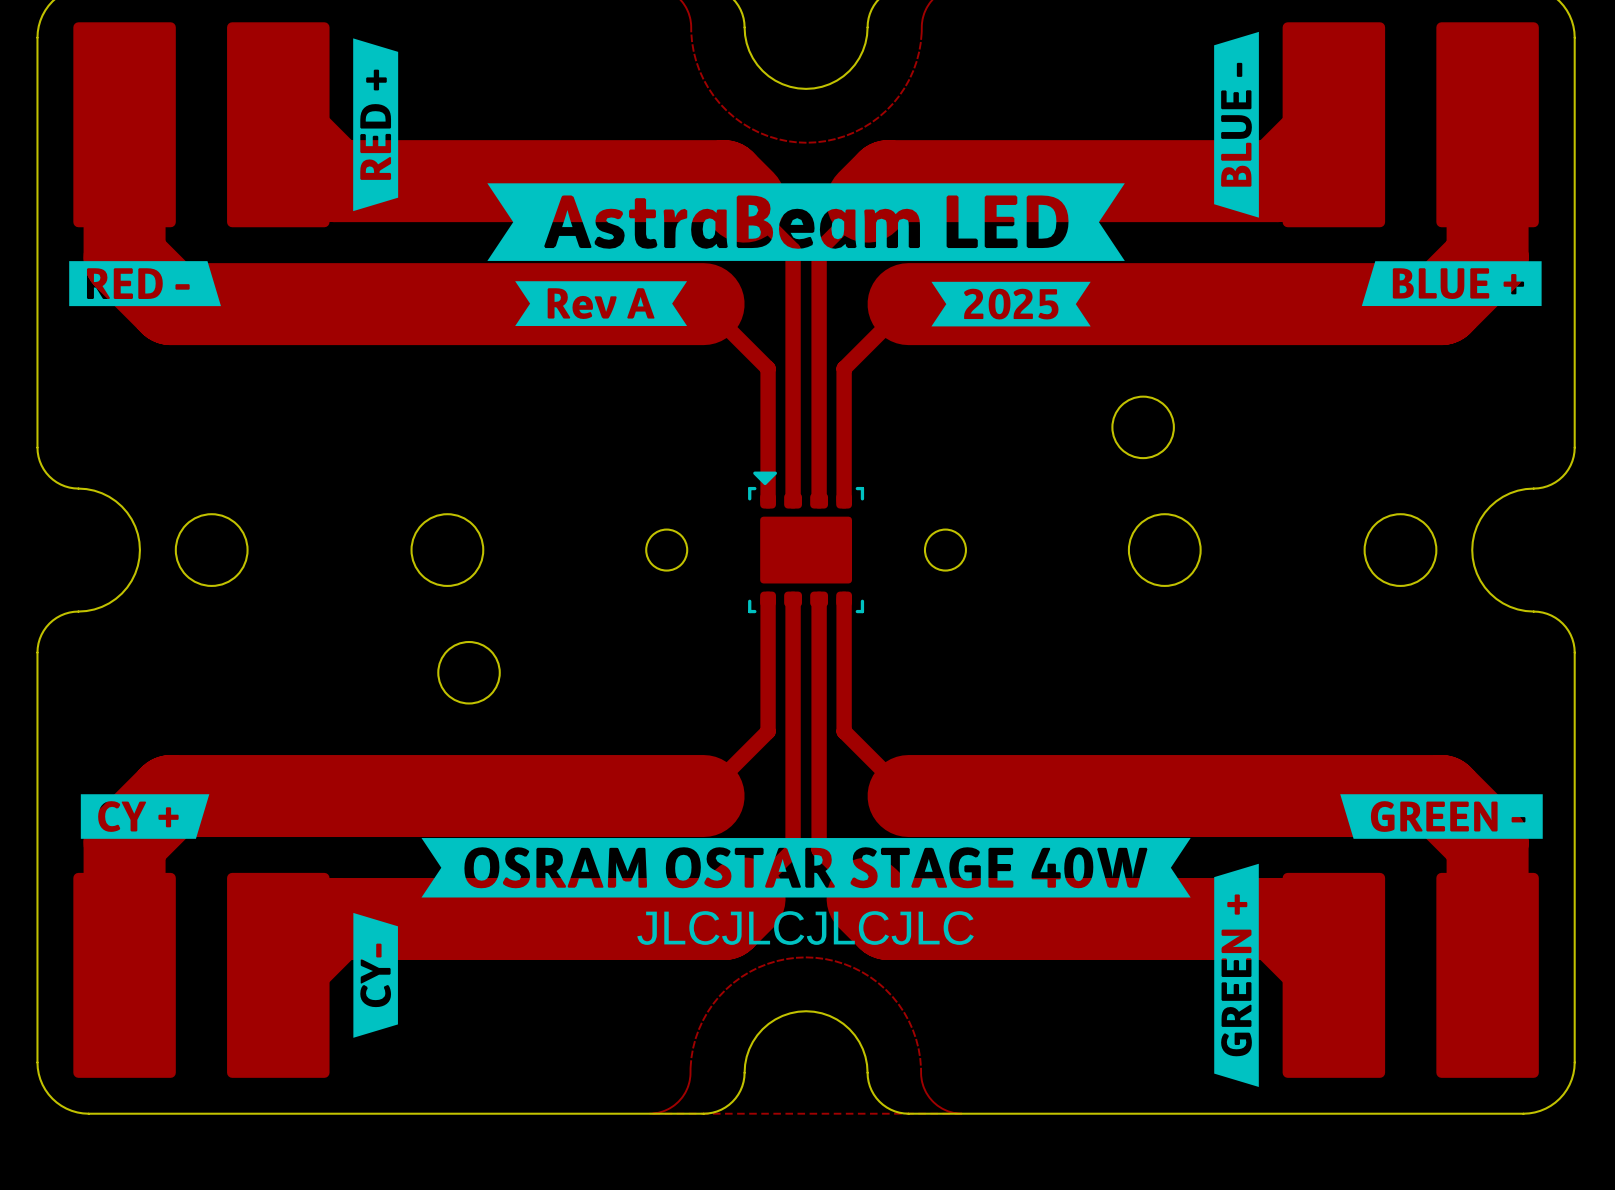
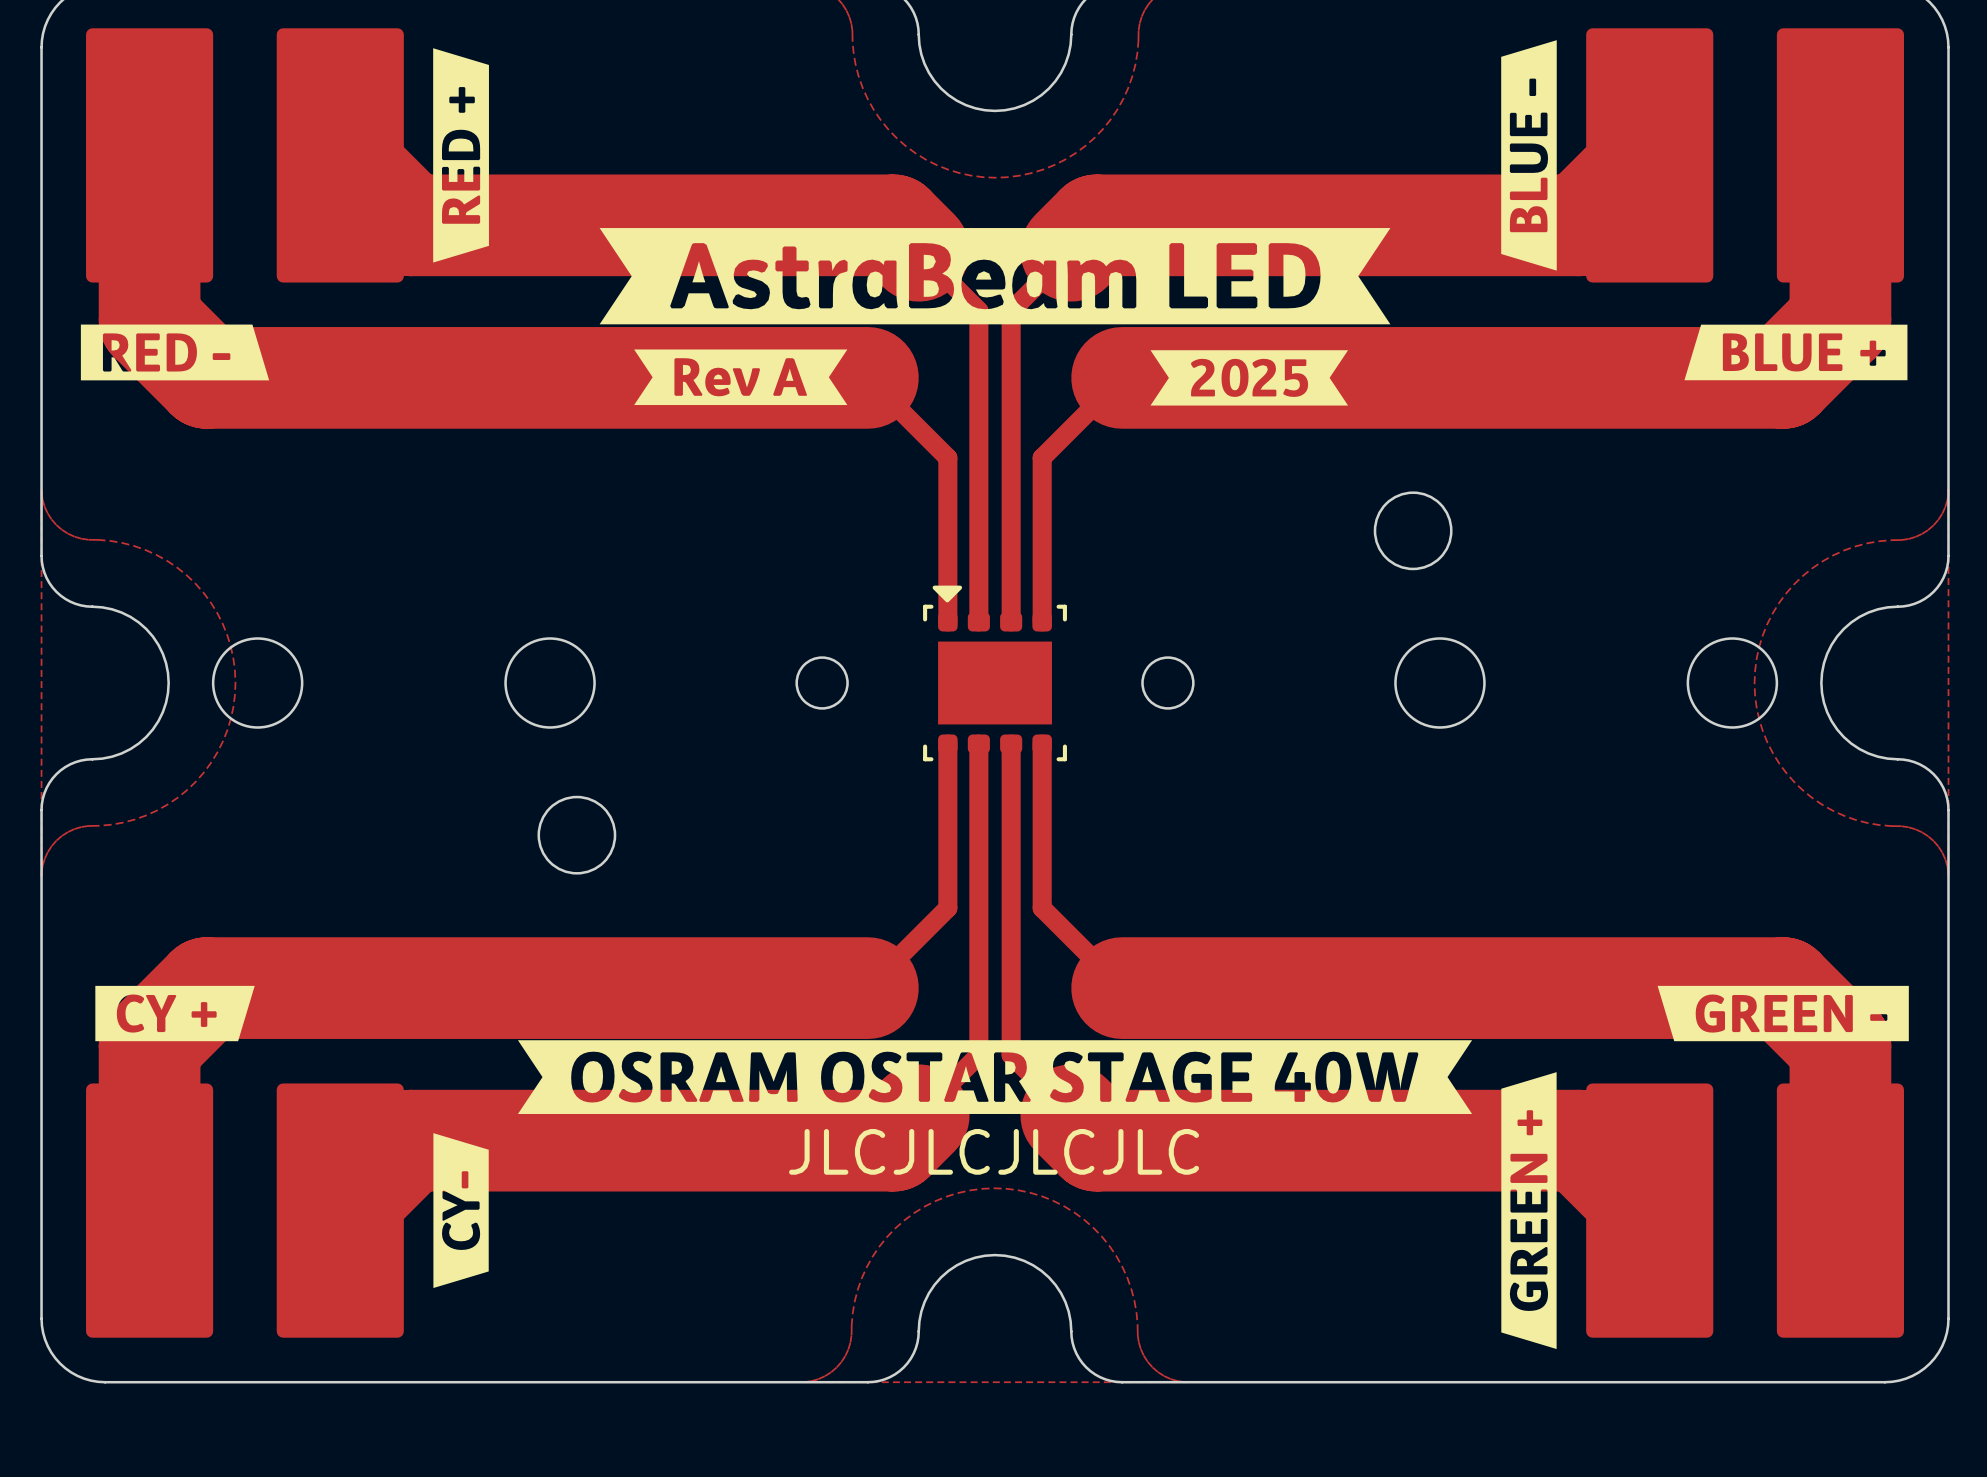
top zone outline: none -> (41, 488) (42, 499) (47, 513) (56, 524) (67, 533) (81, 538) (122, 542) (145, 550) (177, 567) (195, 583) (210, 602) (222, 623) (233, 658) (235, 682) (233, 707) (222, 741) (210, 762) (195, 781) (177, 797) (145, 815) (122, 822) (81, 826) (67, 832) (56, 840) (47, 852) (42, 865) (41, 876) (41, 488)
top zone outline: none -> (1948, 489) (1947, 500) (1942, 513) (1933, 525) (1922, 533) (1908, 539) (1867, 543) (1844, 550) (1812, 568) (1794, 584) (1779, 603) (1767, 624) (1756, 658) (1754, 683) (1756, 707) (1767, 742) (1779, 763) (1794, 782) (1812, 798) (1844, 815) (1867, 823) (1908, 827) (1922, 832) (1933, 841) (1942, 852) (1947, 866) (1948, 877) (1948, 489)
part footprint: [748, 471, 865, 614] -> [923, 585, 1067, 762]

